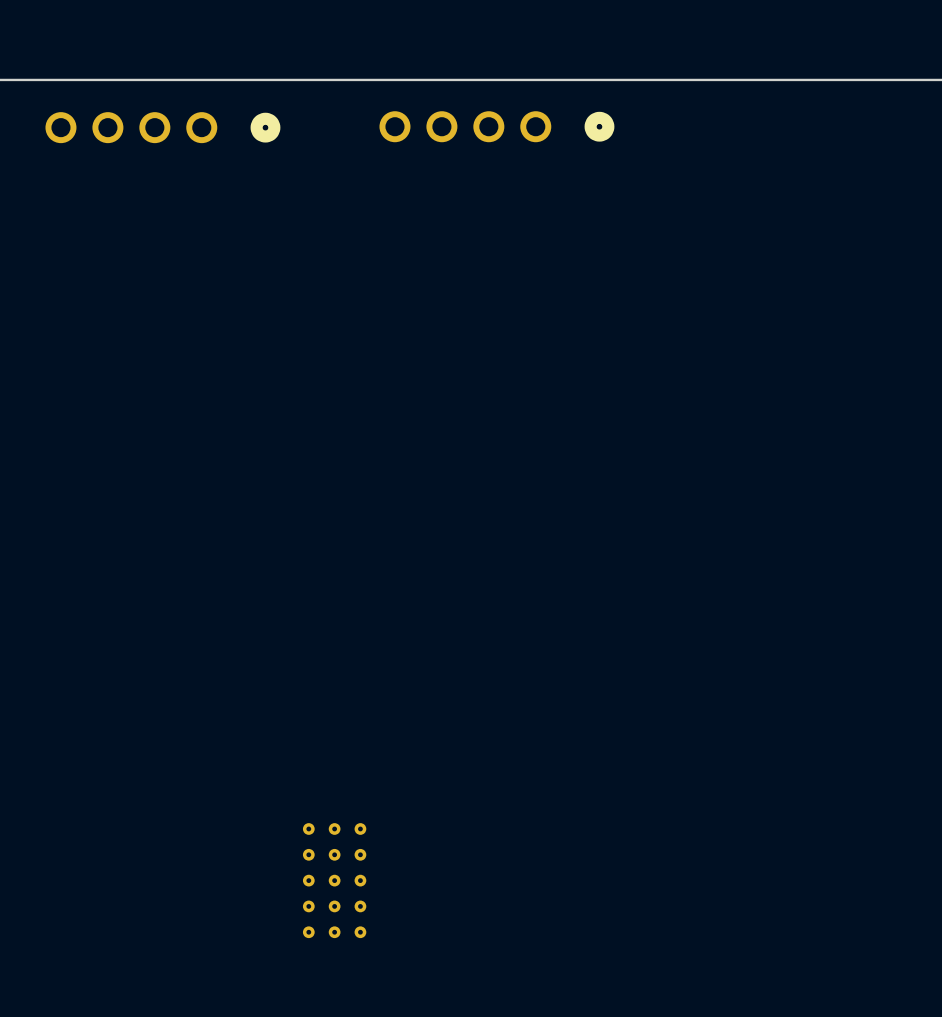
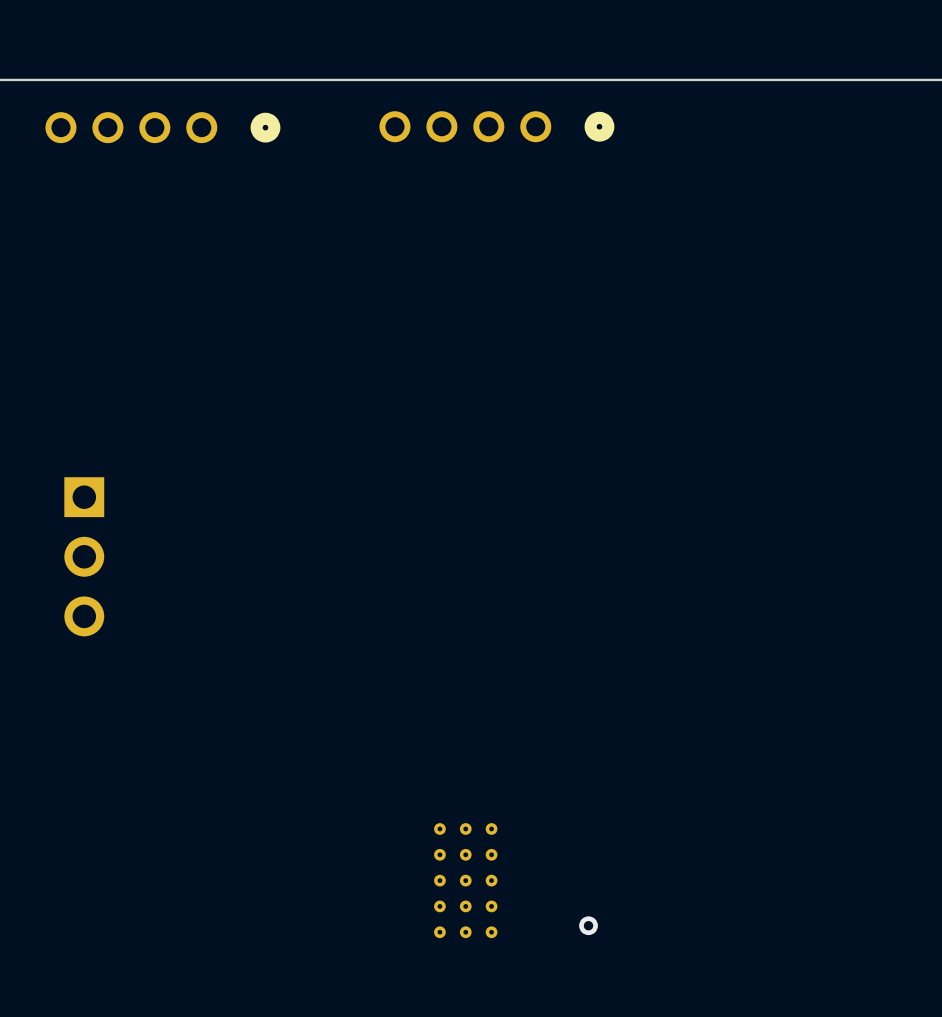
part: none -> (84, 556)
part position: (334, 880) -> (465, 880)
via: none -> (588, 925)

